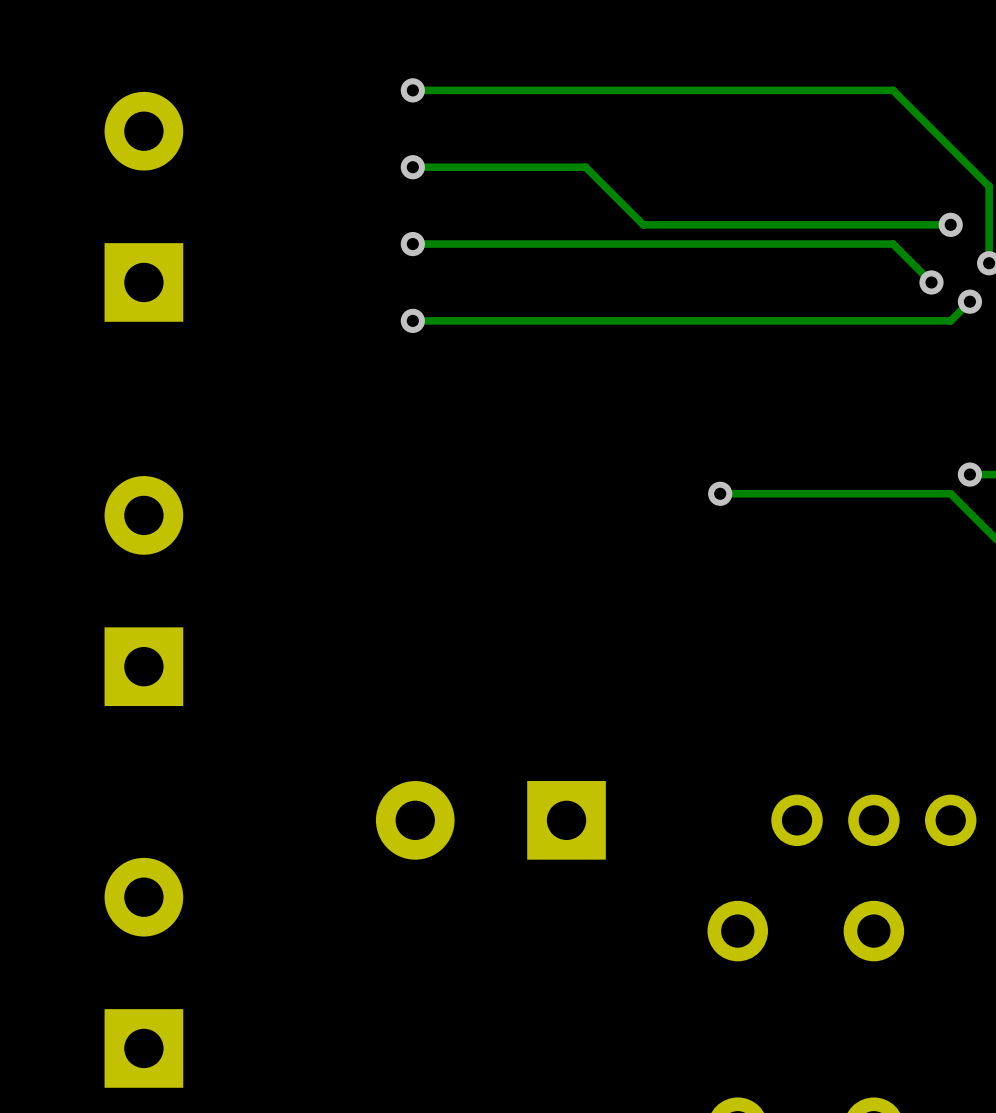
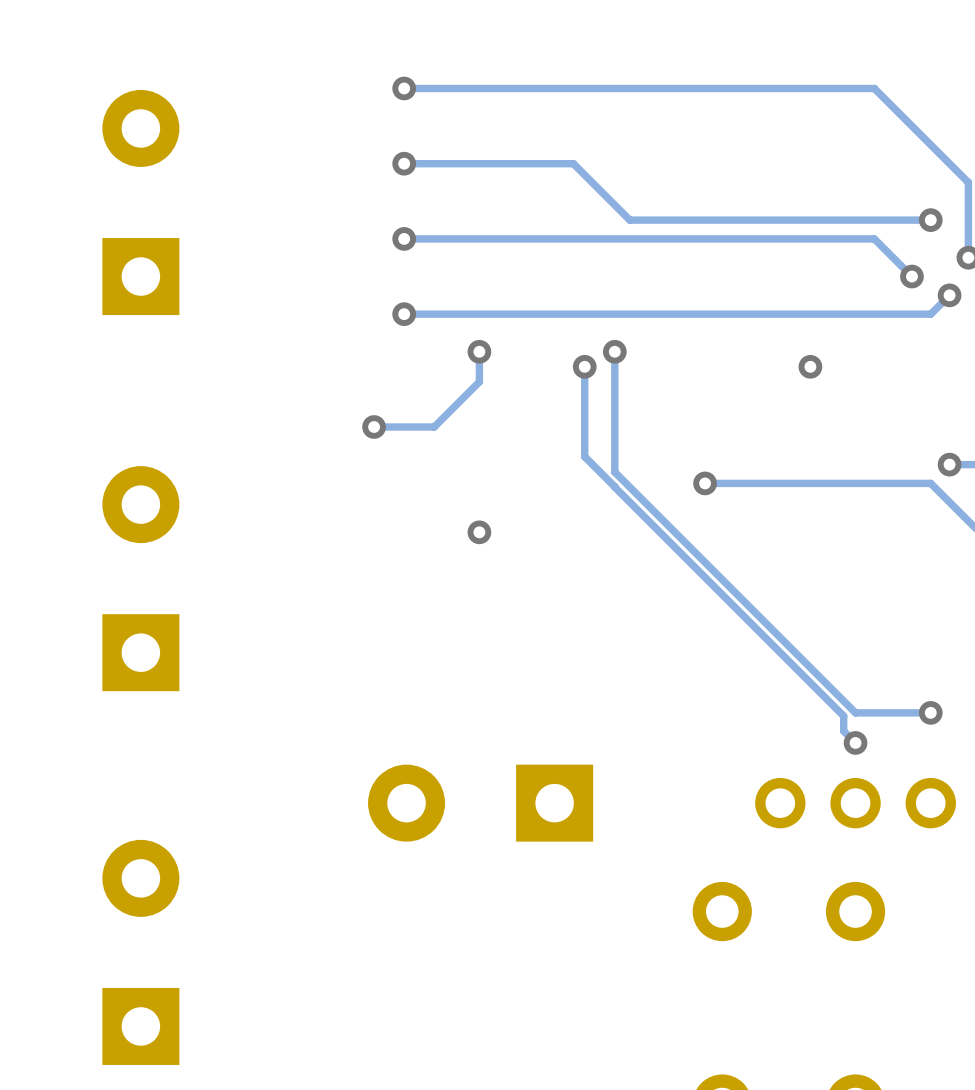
track: none -> (479, 351) (479, 381) (434, 427) (374, 427)
via: none -> (479, 351)
track: none -> (614, 351) (614, 472) (855, 712) (930, 712)
via: none -> (614, 351)
track: none -> (584, 366) (584, 456) (614, 486)
via: none -> (584, 366)
via: none -> (810, 366)
via: none -> (374, 427)
track: none -> (614, 487) (843, 716) (843, 731) (855, 742)
via: none -> (479, 532)
via: none -> (930, 712)
via: none -> (855, 742)

